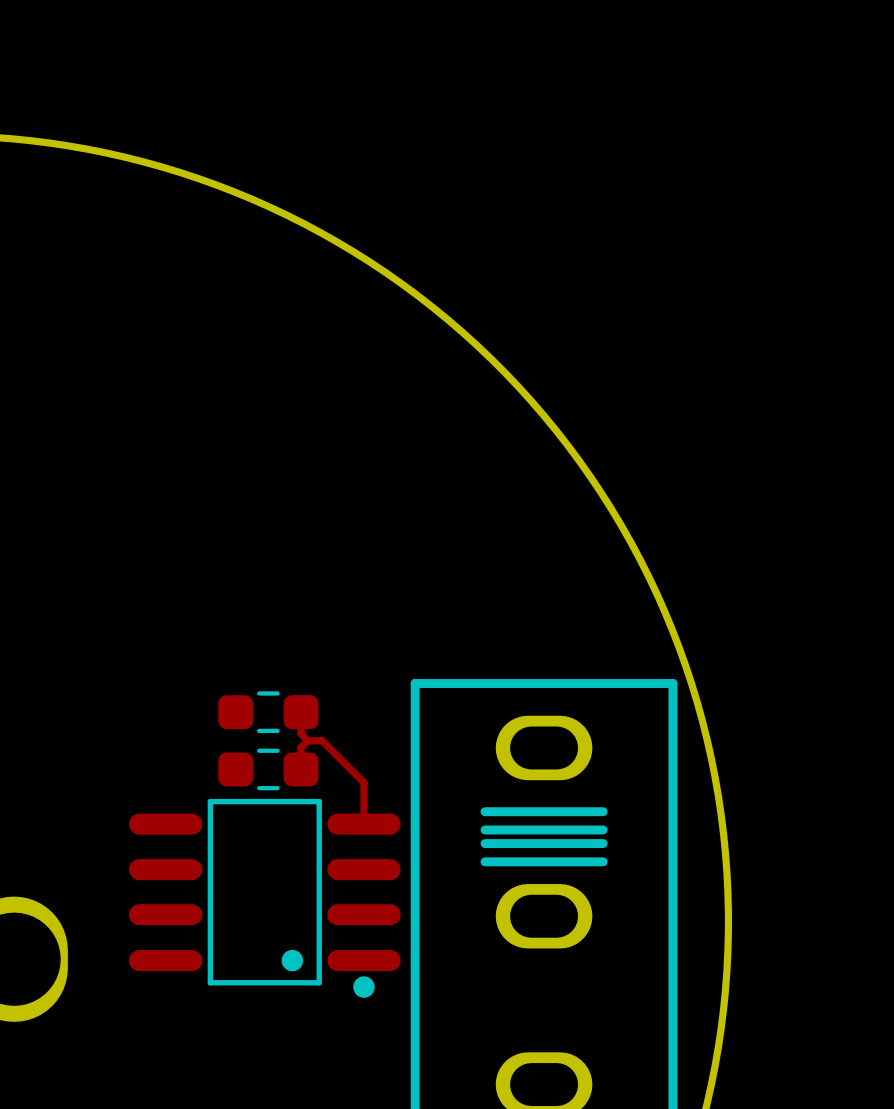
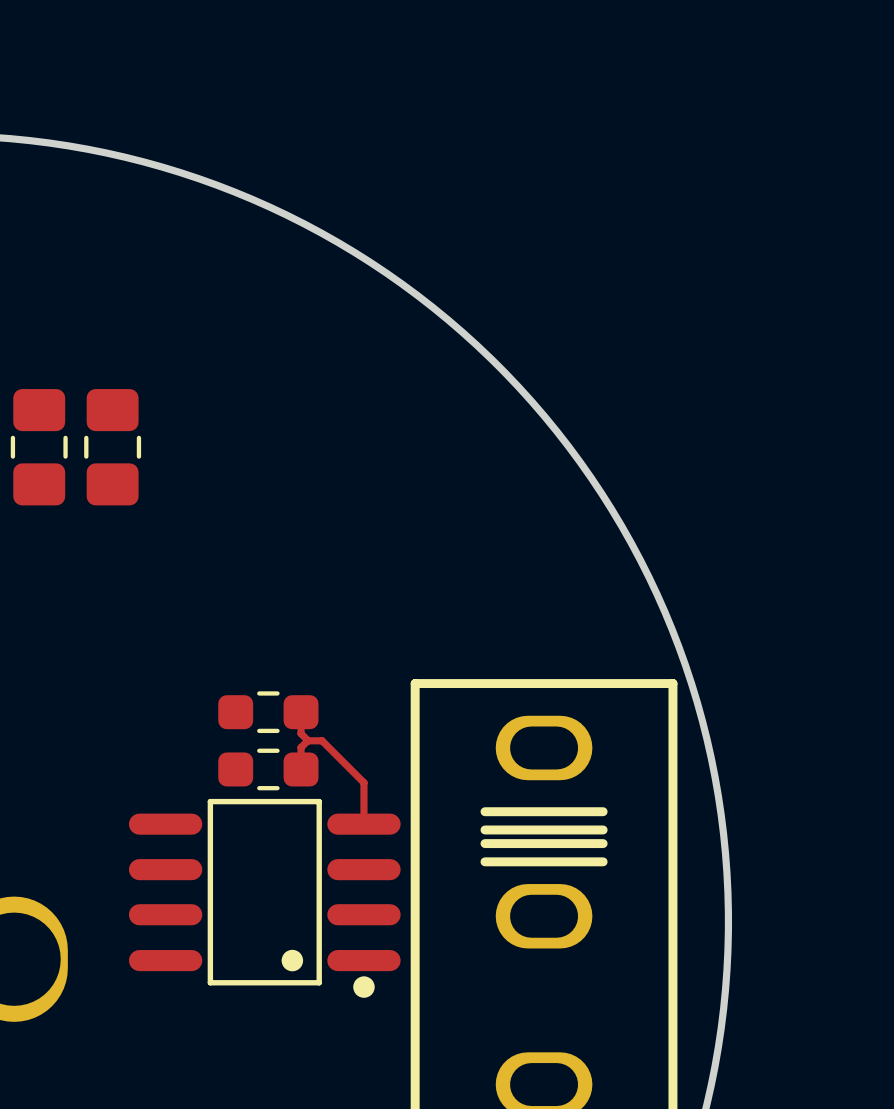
part: none -> (39, 447)
part: none -> (112, 447)

